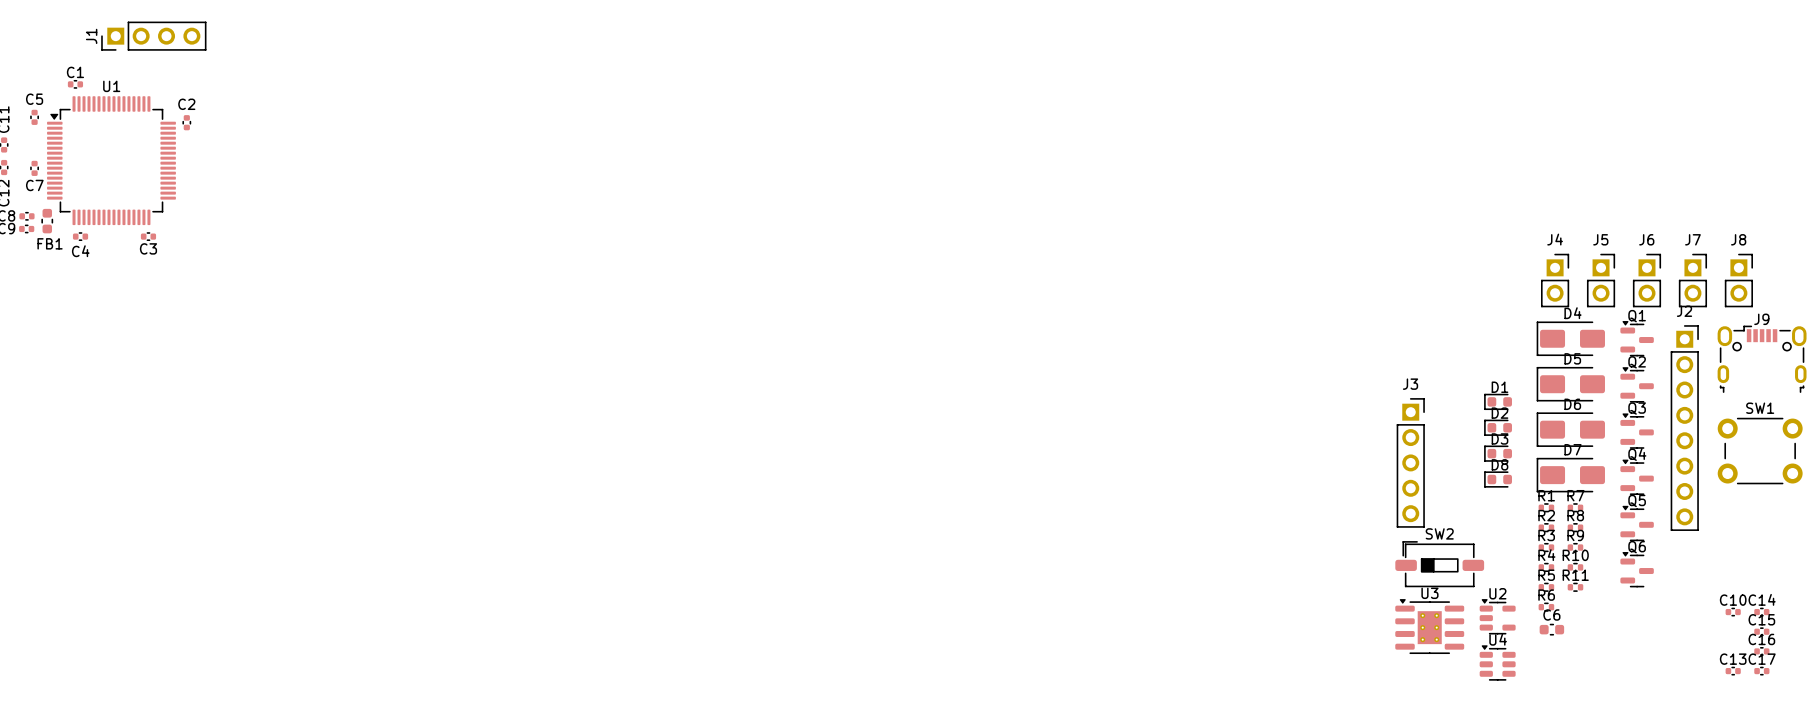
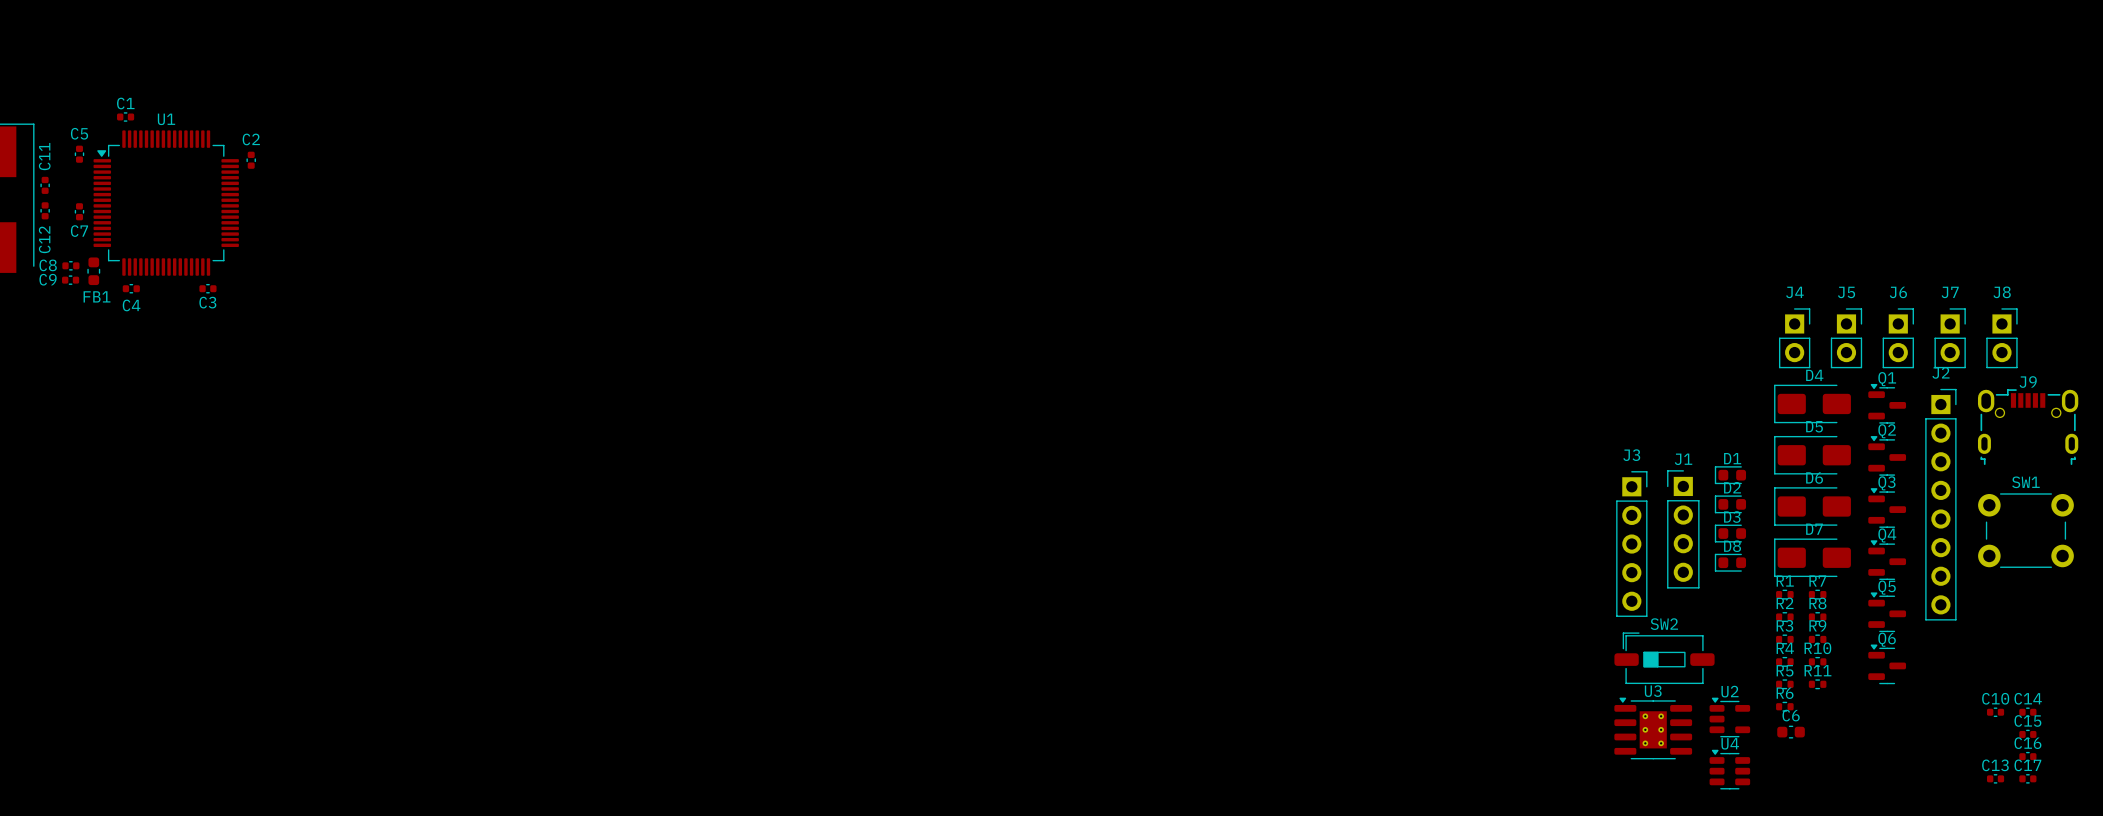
J1 rotation: 0° (153, 36) -> 90° clockwise (1683, 529)
J1 position: (153, 36) -> (1683, 529)

